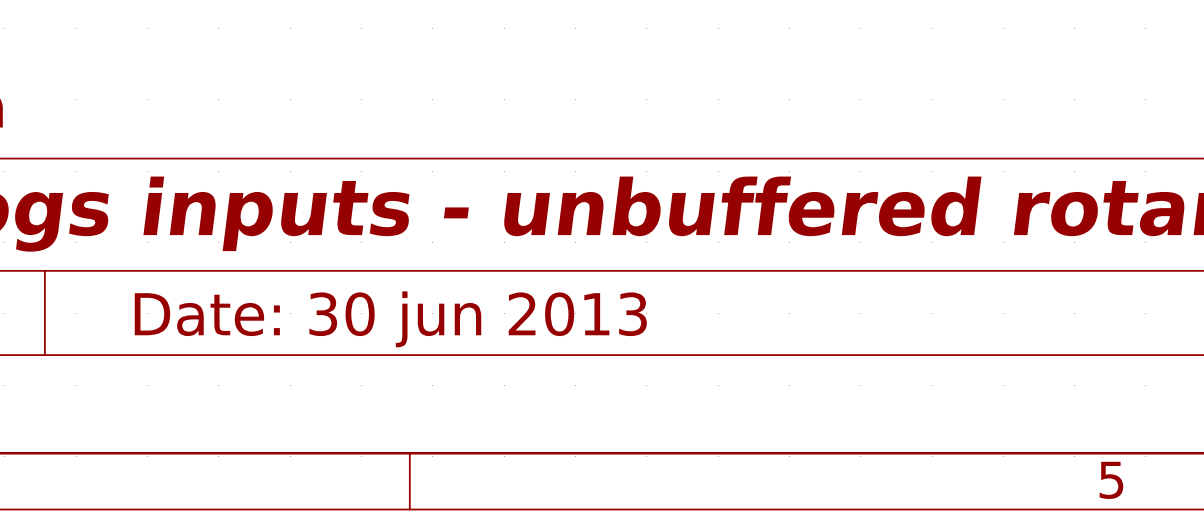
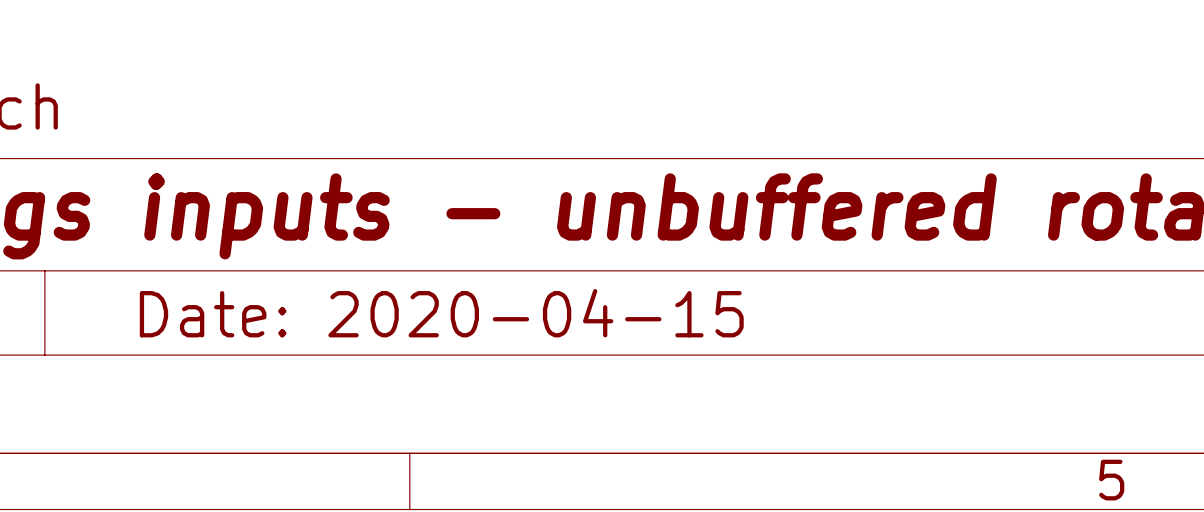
title block: Date: 30 jun 2013 (390, 319) -> Date: 2020-04-15 (441, 313)

